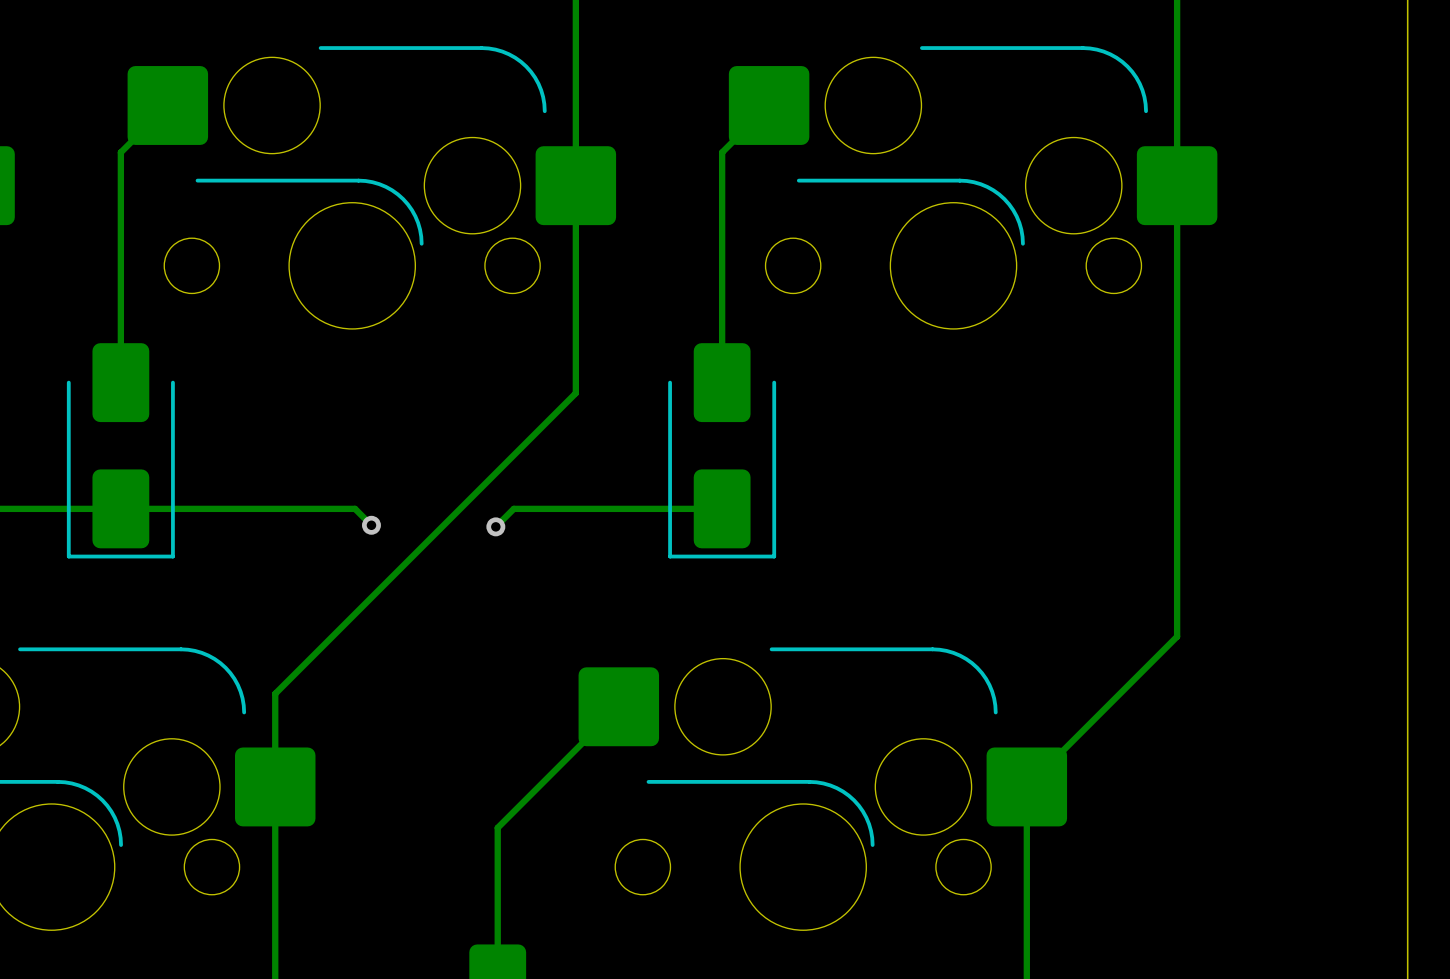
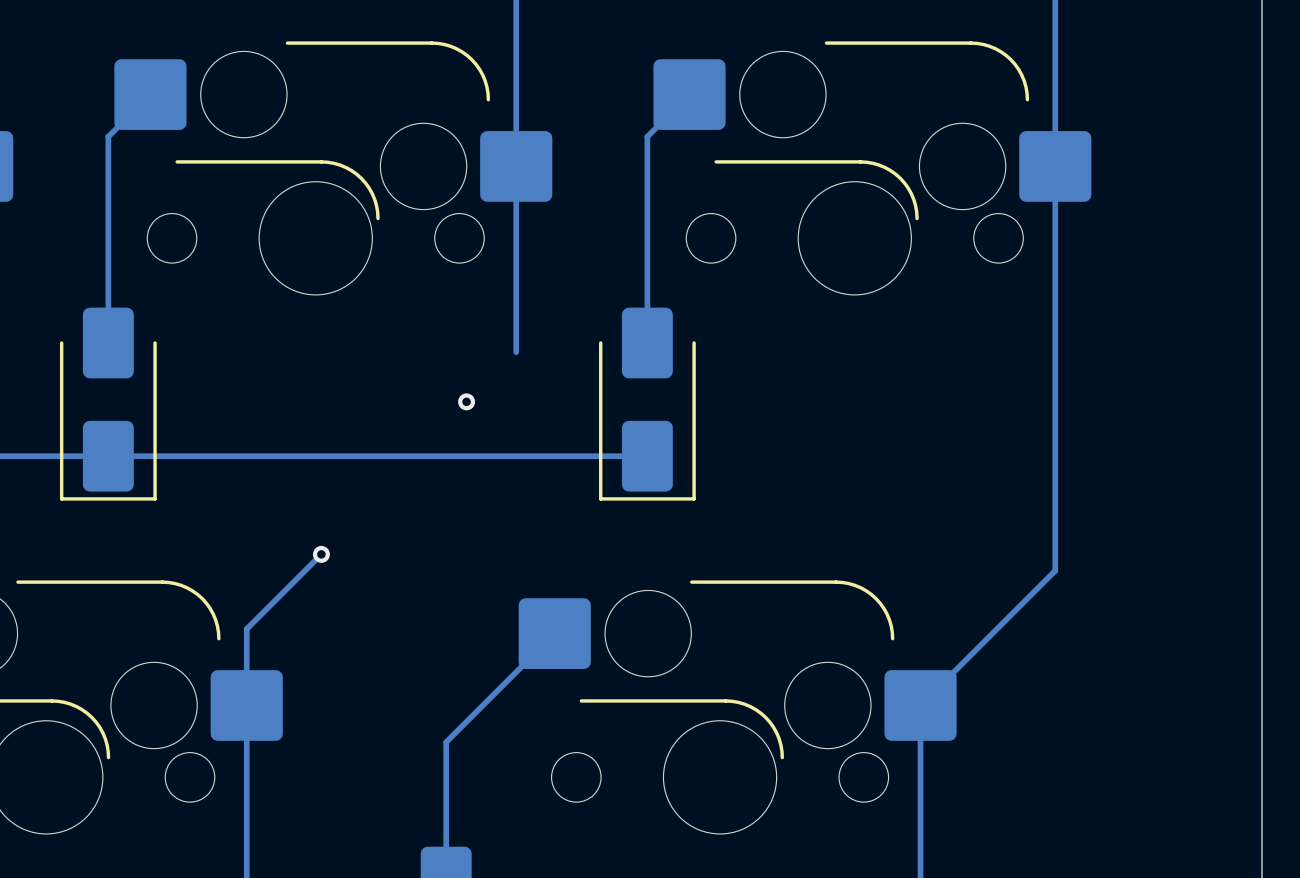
track: (575, 393) (275, 693) (275, 701) -> (321, 554) (246, 629)
via: none -> (466, 401)
track: (355, 508) (371, 525) -> none
track: (513, 508) (495, 526) -> (460, 456) (318, 456)
via: (371, 525) -> none
via: (495, 526) -> none
via: none -> (321, 554)

